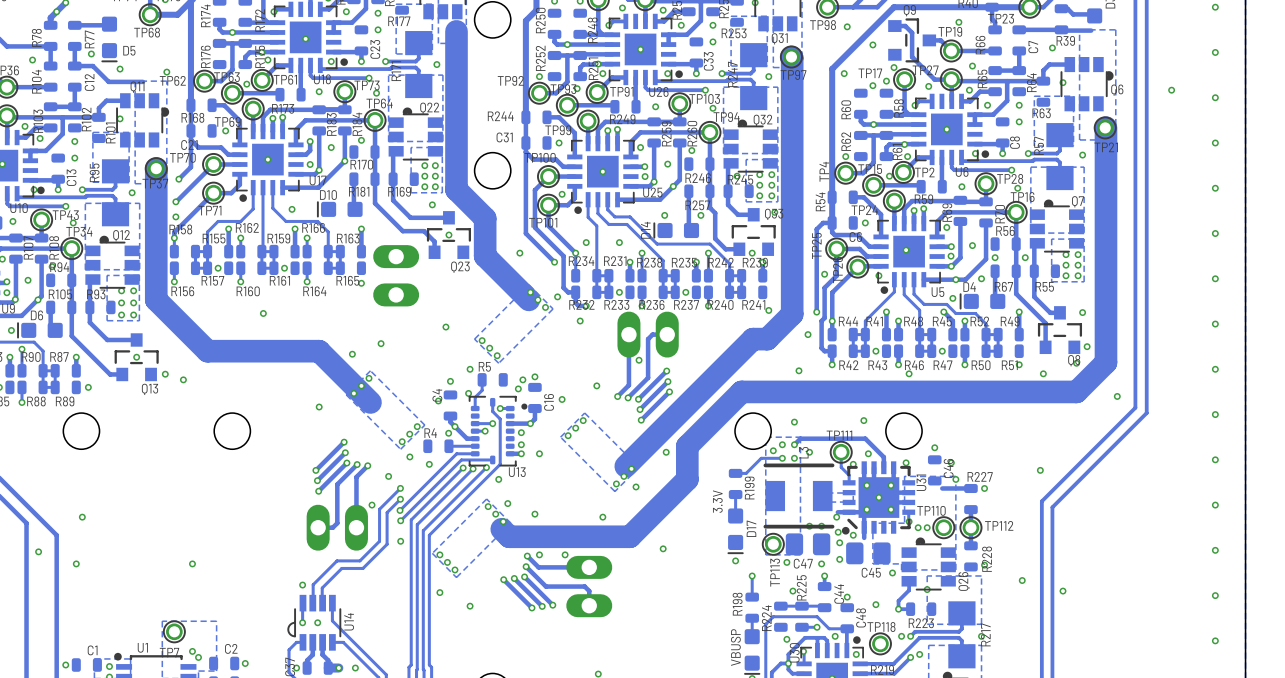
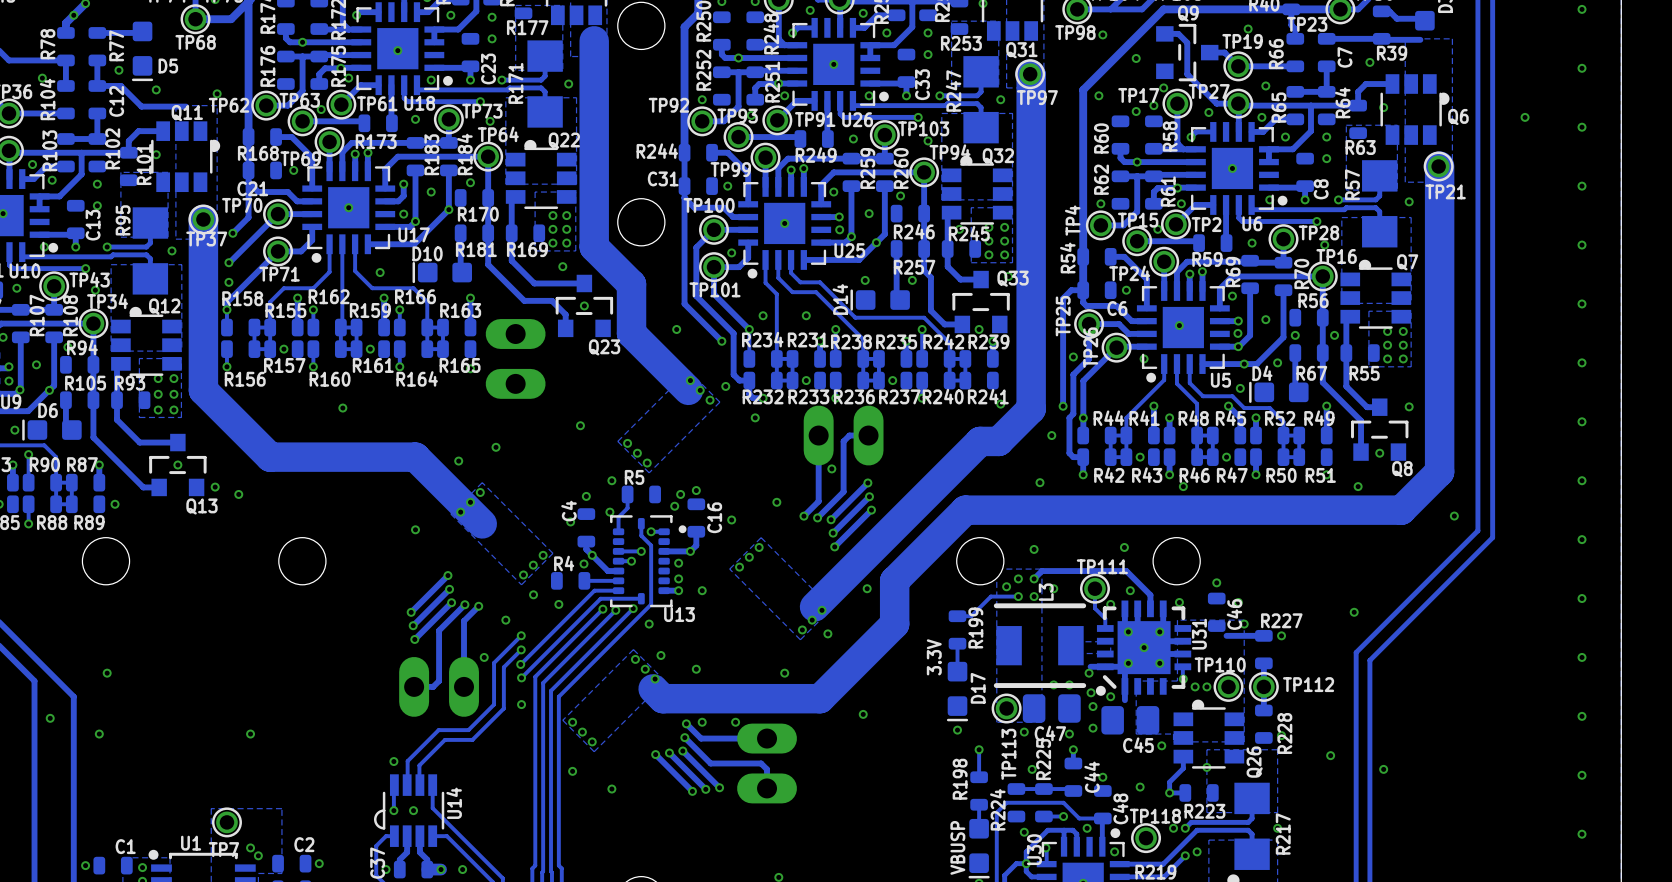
via: (1087, 346) -> none
via: none -> (1379, 453)
via: (1076, 363) -> none

